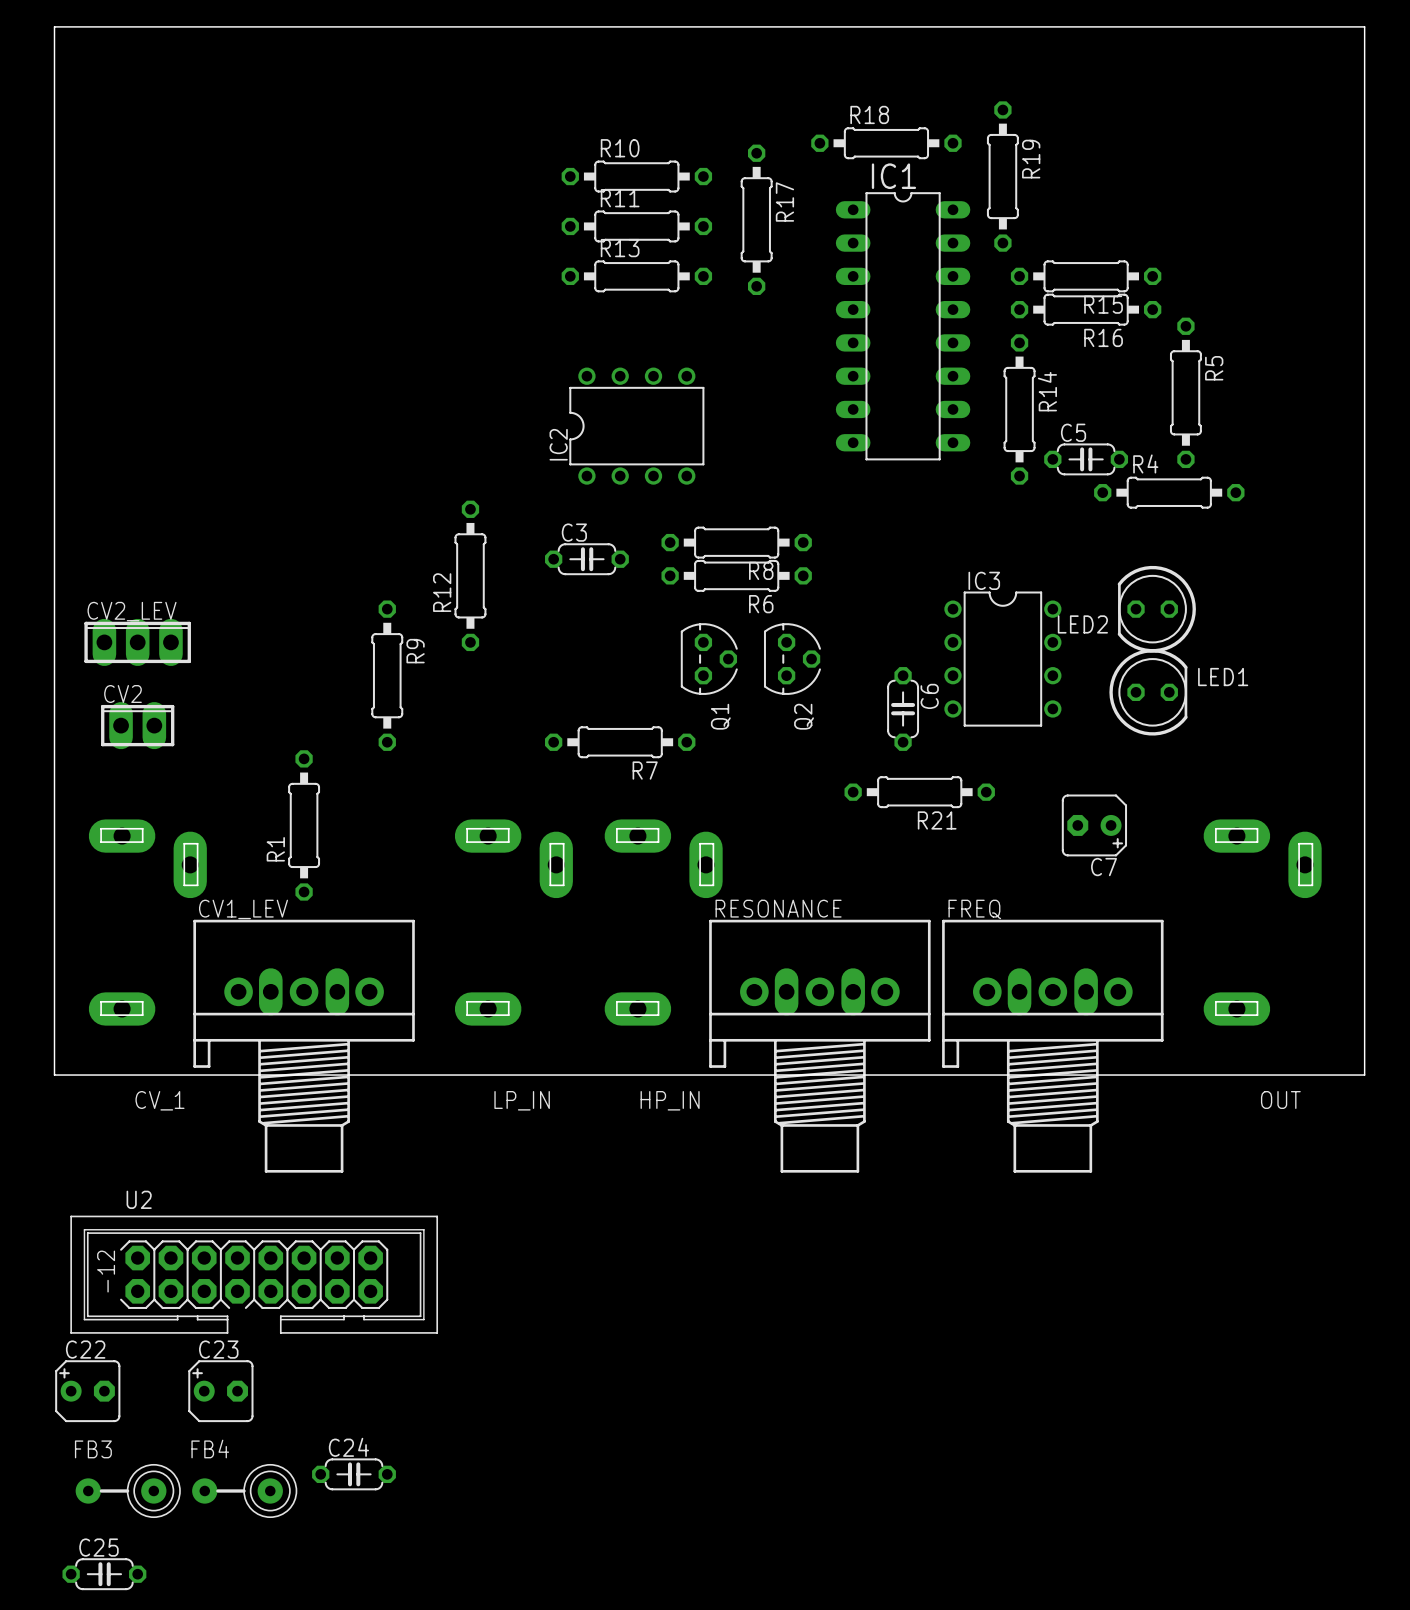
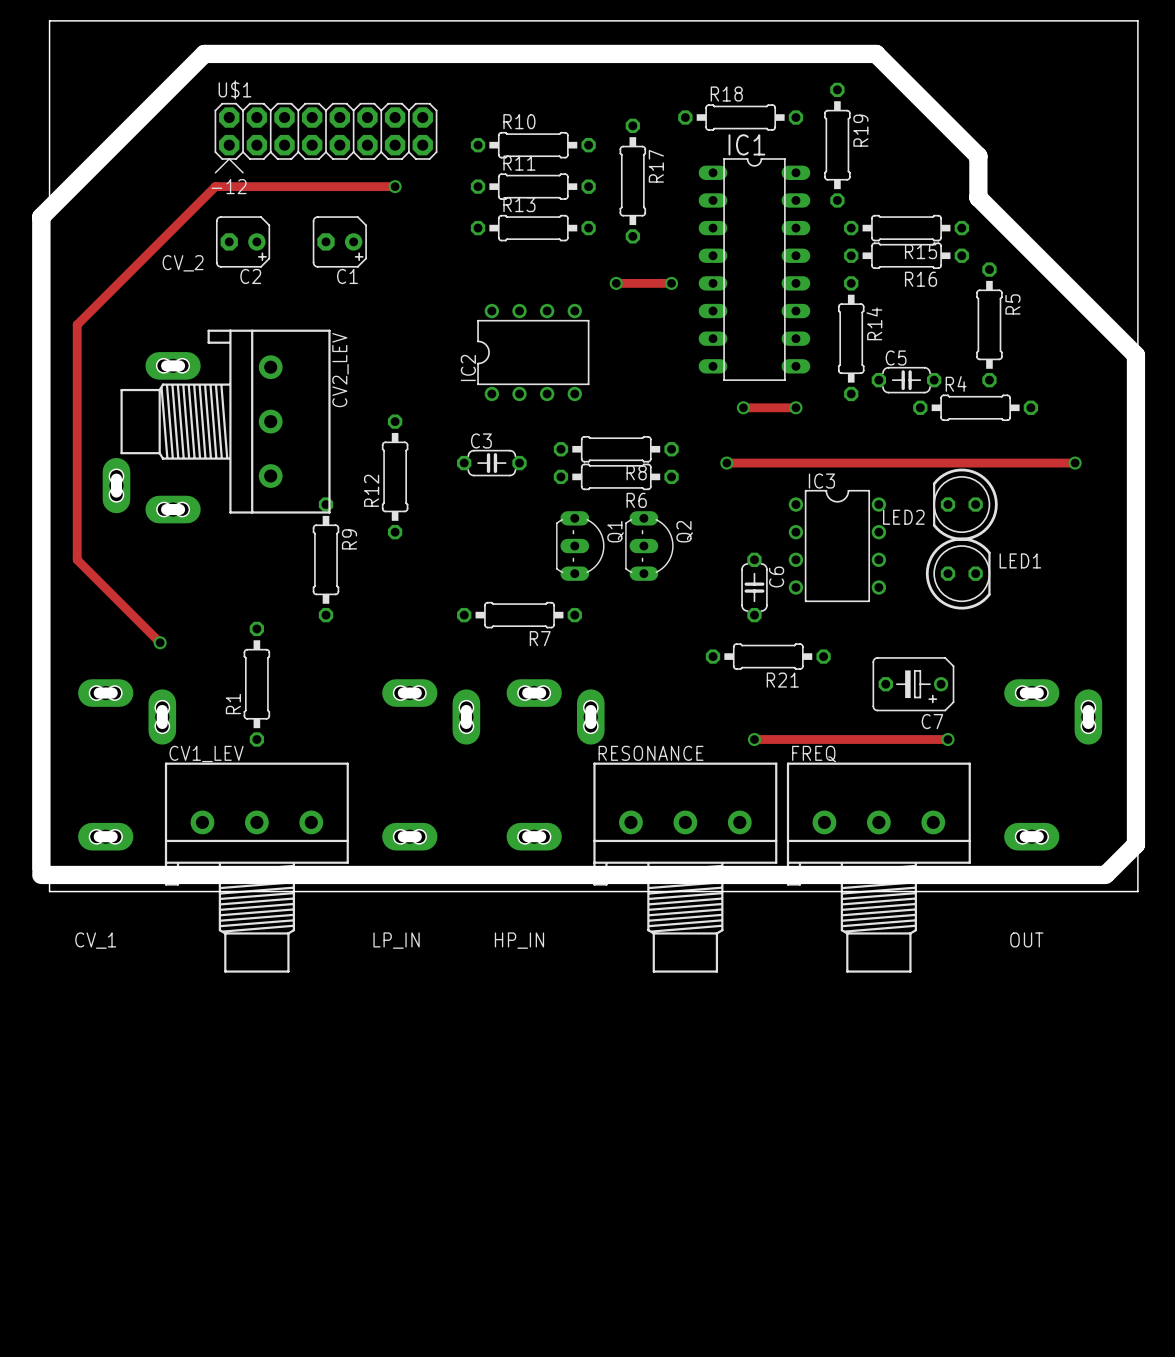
U$1: none -> (325, 138)
track: none -> (395, 186) (215, 186) (77, 324) (77, 559) (160, 642)
via: none -> (395, 186)
C2: none -> (243, 241)
C1: none -> (339, 241)
track: none -> (616, 283) (671, 283)
via: none -> (616, 283)
via: none -> (671, 283)
track: none -> (743, 407) (795, 407)
via: none -> (743, 407)
via: none -> (795, 407)
CV_2: none -> (151, 437)
track: none -> (726, 463) (1075, 463)
via: none -> (726, 463)
via: none -> (1075, 463)
CV2_LEV name position: CV2_LEV (132, 611) -> CV2_LEV (340, 370)
CV2_LEV footprint: [84, 618, 191, 667] -> [120, 329, 331, 514]
Q1 footprint: [680, 623, 738, 695] -> [556, 511, 605, 581]
Q2 footprint: [763, 623, 821, 695] -> [625, 511, 674, 581]
Q1 name position: Q1 (720, 716) -> Q1 (615, 531)
Q2 name position: Q2 (804, 716) -> Q2 (684, 531)
CV2: (137, 725) -> none
via: none -> (160, 642)
C7 footprint: [1061, 794, 1128, 857] -> [872, 657, 955, 712]
CV_1 footprint: [88, 819, 207, 1026] -> [78, 679, 177, 851]
LP_IN footprint: [454, 819, 573, 1026] -> [382, 679, 481, 851]
HP_IN footprint: [604, 819, 723, 1026] -> [506, 679, 605, 851]
OUT footprint: [1203, 819, 1322, 1026] -> [1004, 679, 1103, 851]
track: none -> (754, 739) (947, 739)
via: none -> (754, 739)
via: none -> (947, 739)
CV1_LEV footprint: [193, 919, 415, 1173] -> [164, 762, 349, 973]
RESONANCE footprint: [709, 919, 931, 1173] -> [593, 762, 778, 973]
FREQ footprint: [942, 919, 1164, 1173] -> [786, 762, 971, 973]
board edge: none -> (41, 869) (41, 217) (204, 53) (876, 53) (978, 156) (978, 197) (1135, 355) (1135, 844) (1108, 872)
board edge: none -> (41, 874) (1105, 874)
OUT name position: OUT (1280, 1099) -> OUT (1026, 939)
CV_1 name position: CV_1 (159, 1100) -> CV_1 (95, 940)
LP_IN name position: LP_IN (522, 1100) -> LP_IN (396, 940)
HP_IN name position: HP_IN (670, 1100) -> HP_IN (519, 940)
U2: (254, 1274) -> none
C22: (87, 1391) -> none
C23: (220, 1391) -> none
C24: (353, 1474) -> none
FB3: (128, 1490) -> none
FB4: (244, 1490) -> none
C25: (104, 1574) -> none

